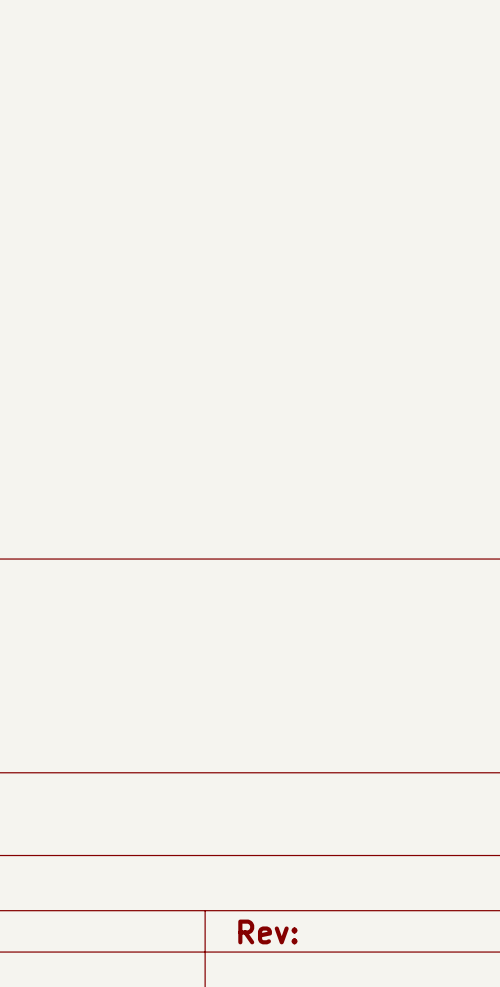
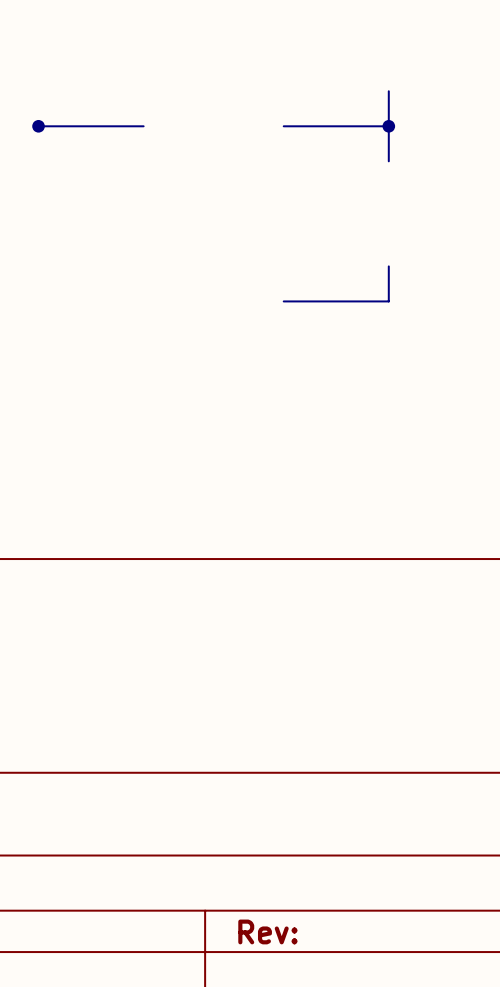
wire: none -> (388, 91) (388, 161)
wire: none -> (38, 126) (143, 126)
junction: none -> (38, 126)
wire: none -> (283, 126) (388, 126)
junction: none -> (388, 126)
wire: none -> (388, 266) (388, 301) (283, 301)

